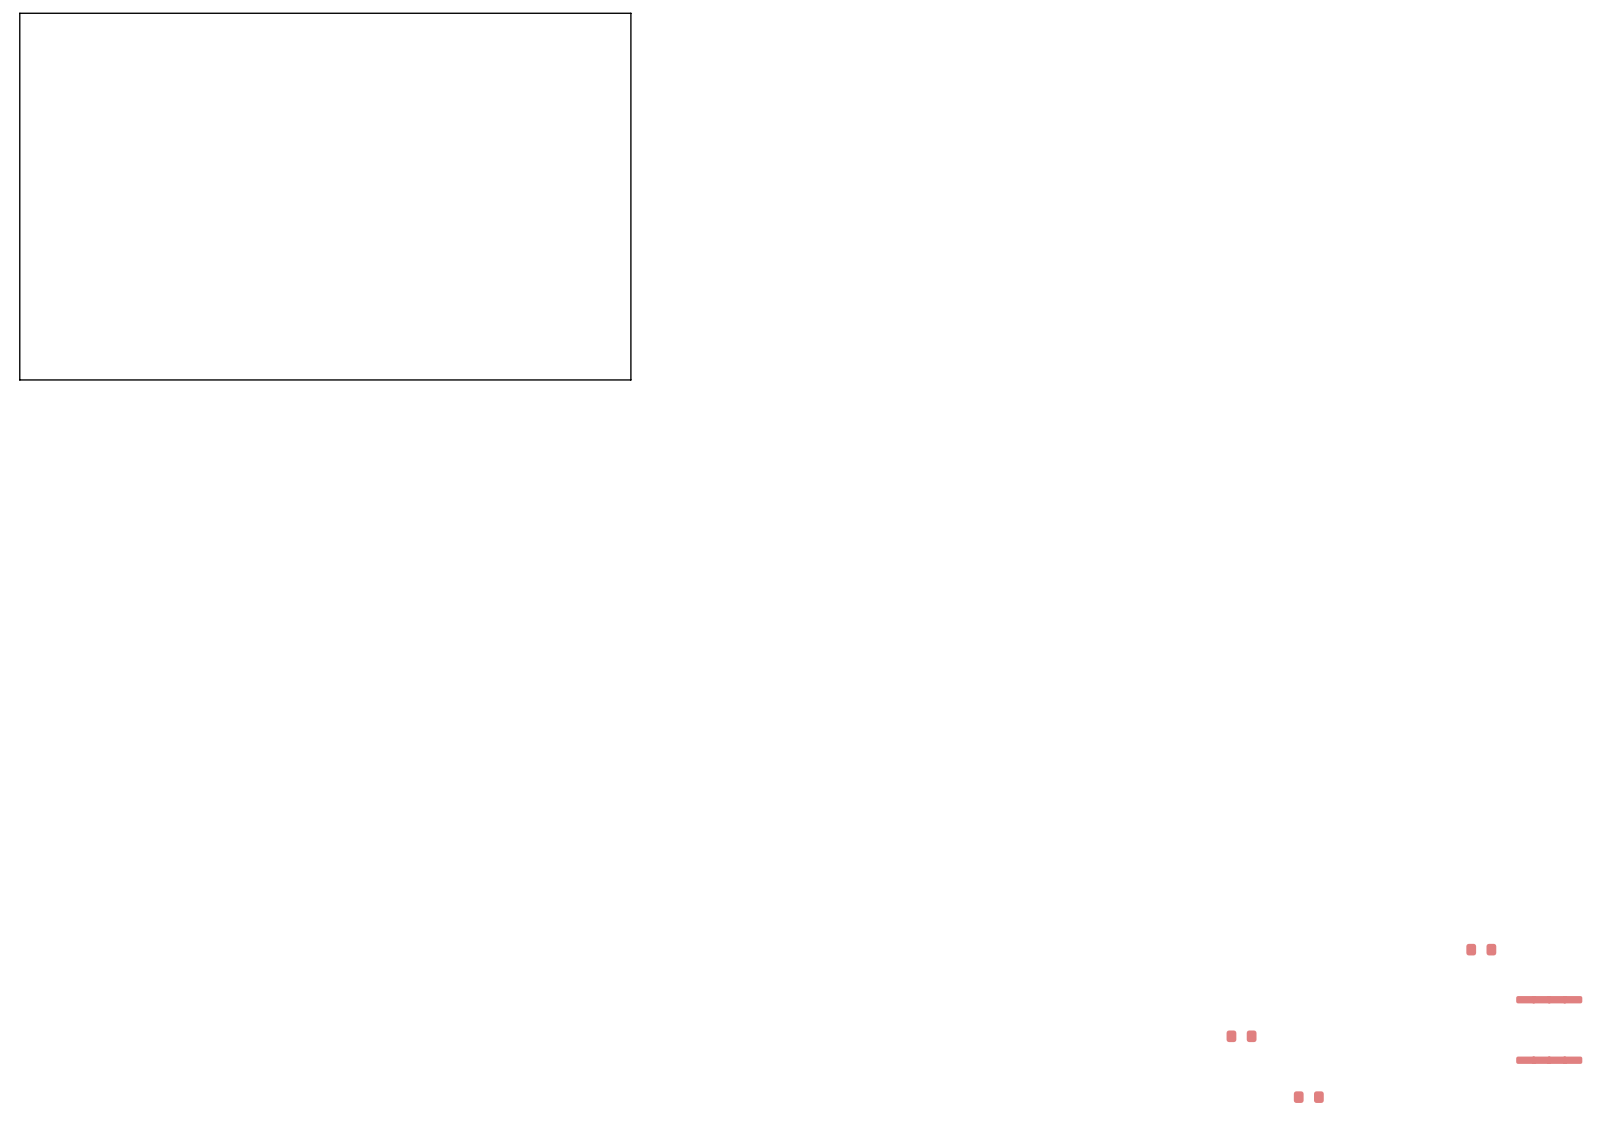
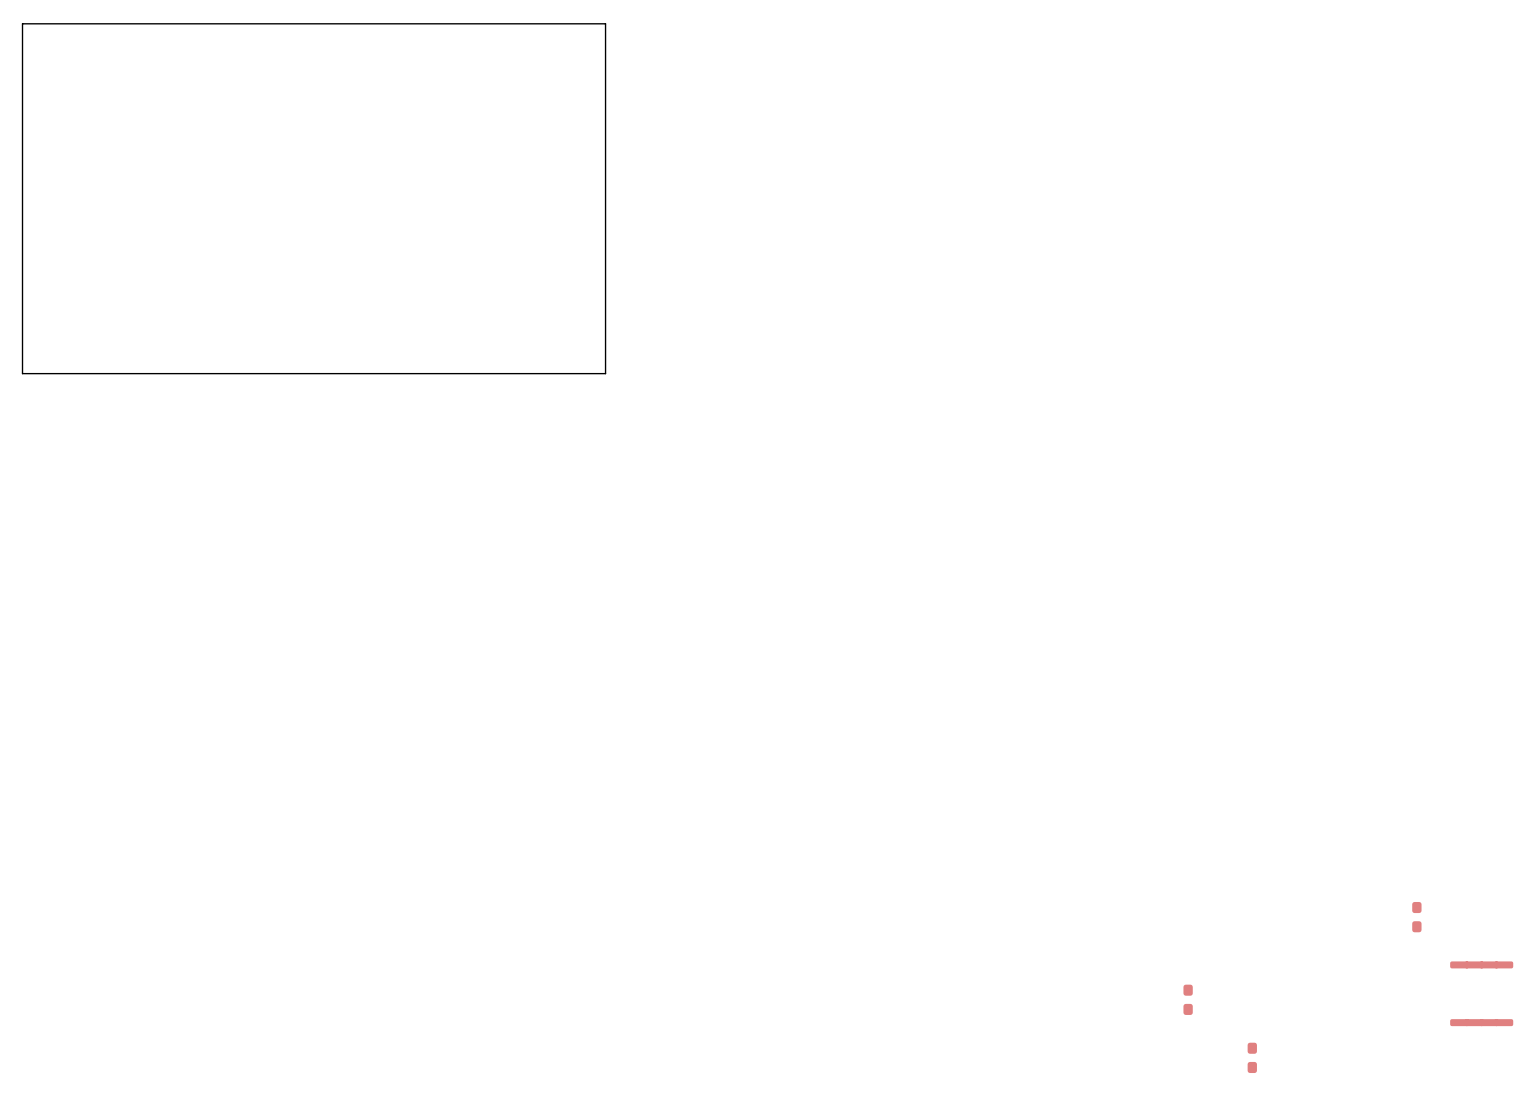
part footprint: [1466, 943, 1497, 956] -> [1412, 901, 1422, 933]
part footprint: [1226, 1030, 1257, 1043] -> [1183, 984, 1193, 1015]
part footprint: [1293, 1091, 1324, 1103] -> [1247, 1042, 1257, 1074]

